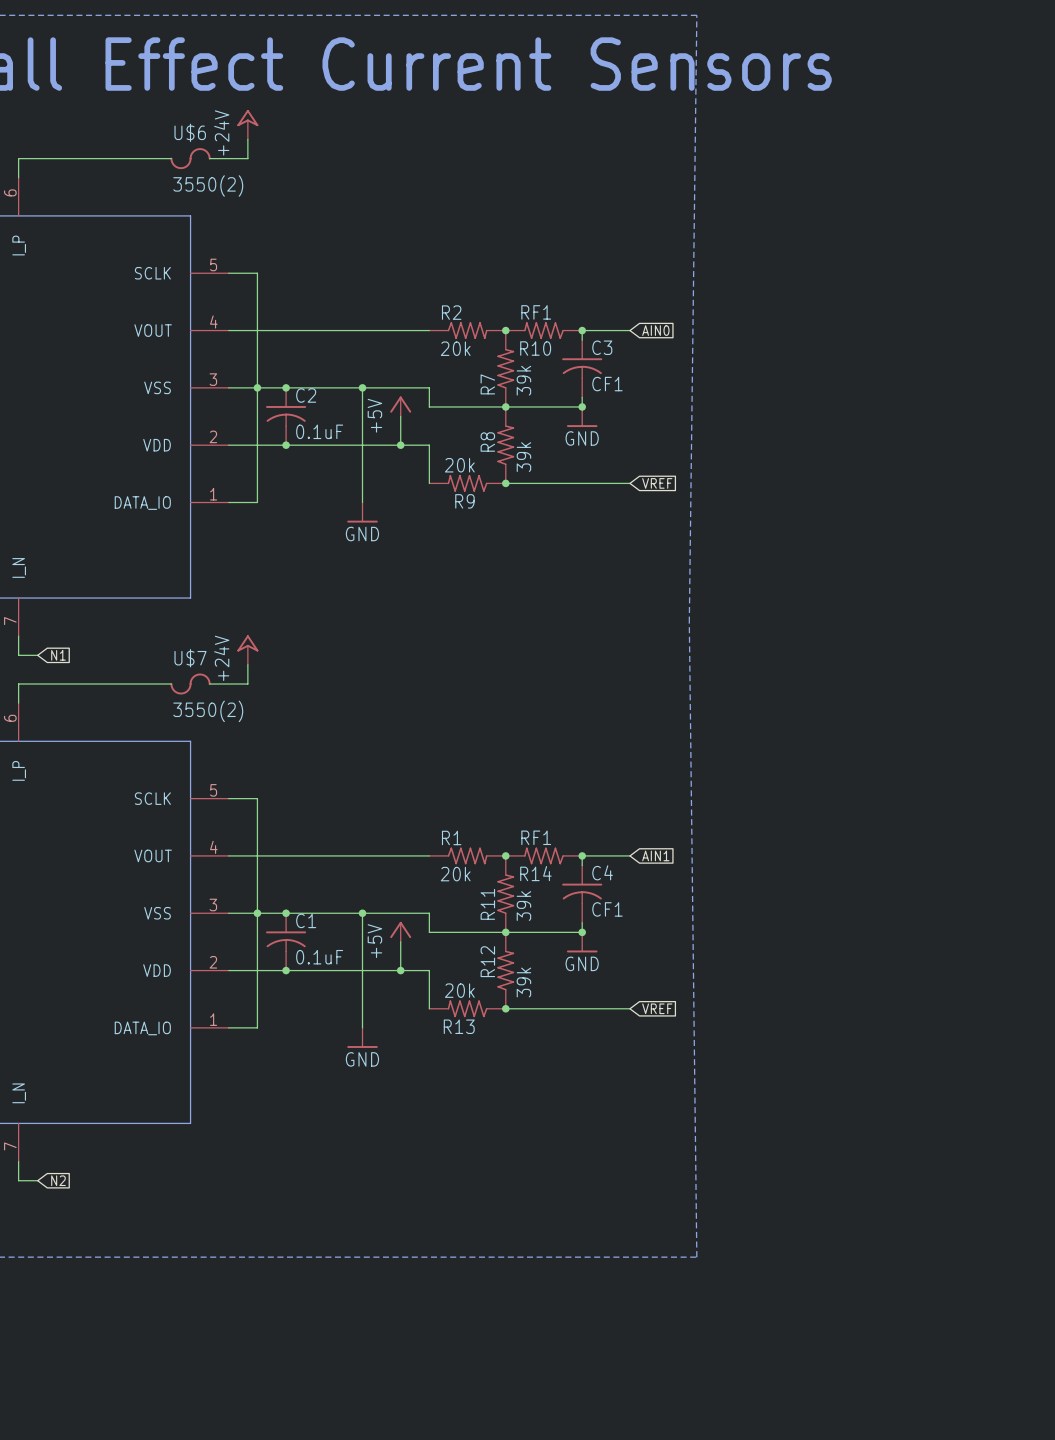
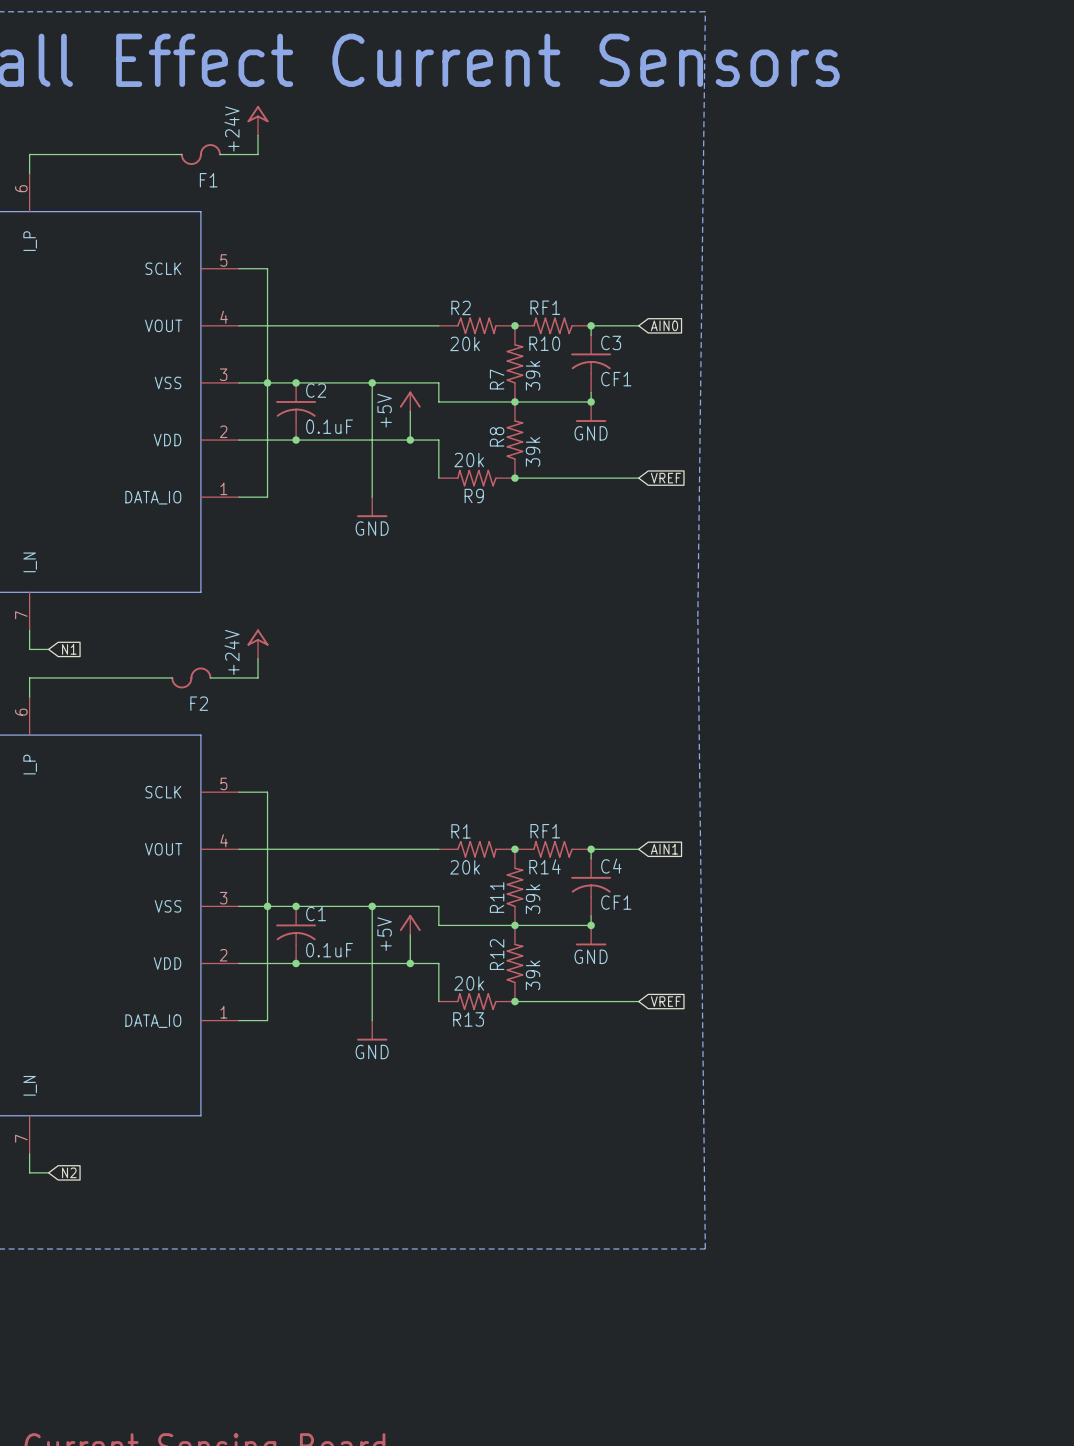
U$6 name: U$6 (190, 132) -> F1 (208, 180)
U$6 value: 3550(2) (208, 186) -> none
wire: (161, 684) (171, 684) -> (210, 677) (219, 677)
F2: none -> (191, 677)
U$7: 3550(2) (190, 684) -> none

